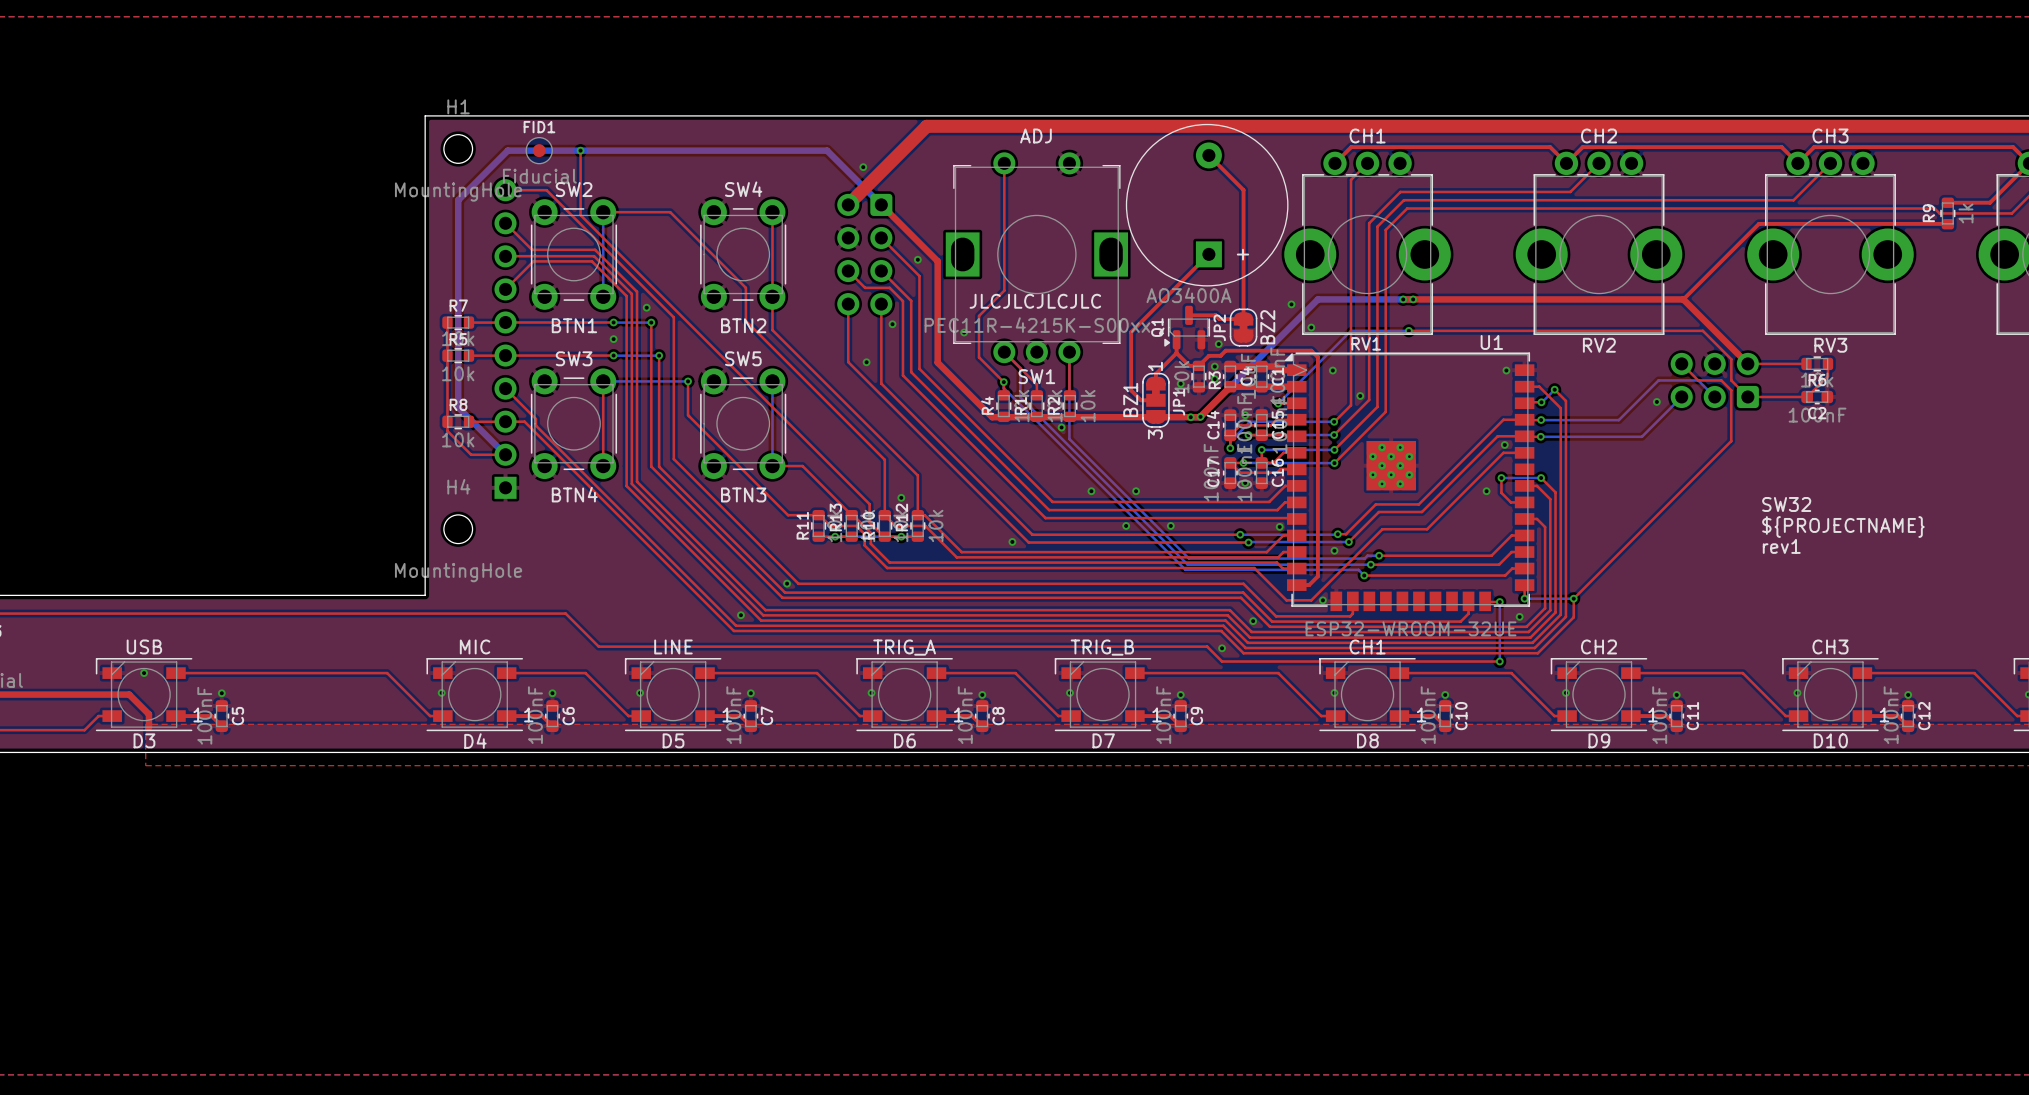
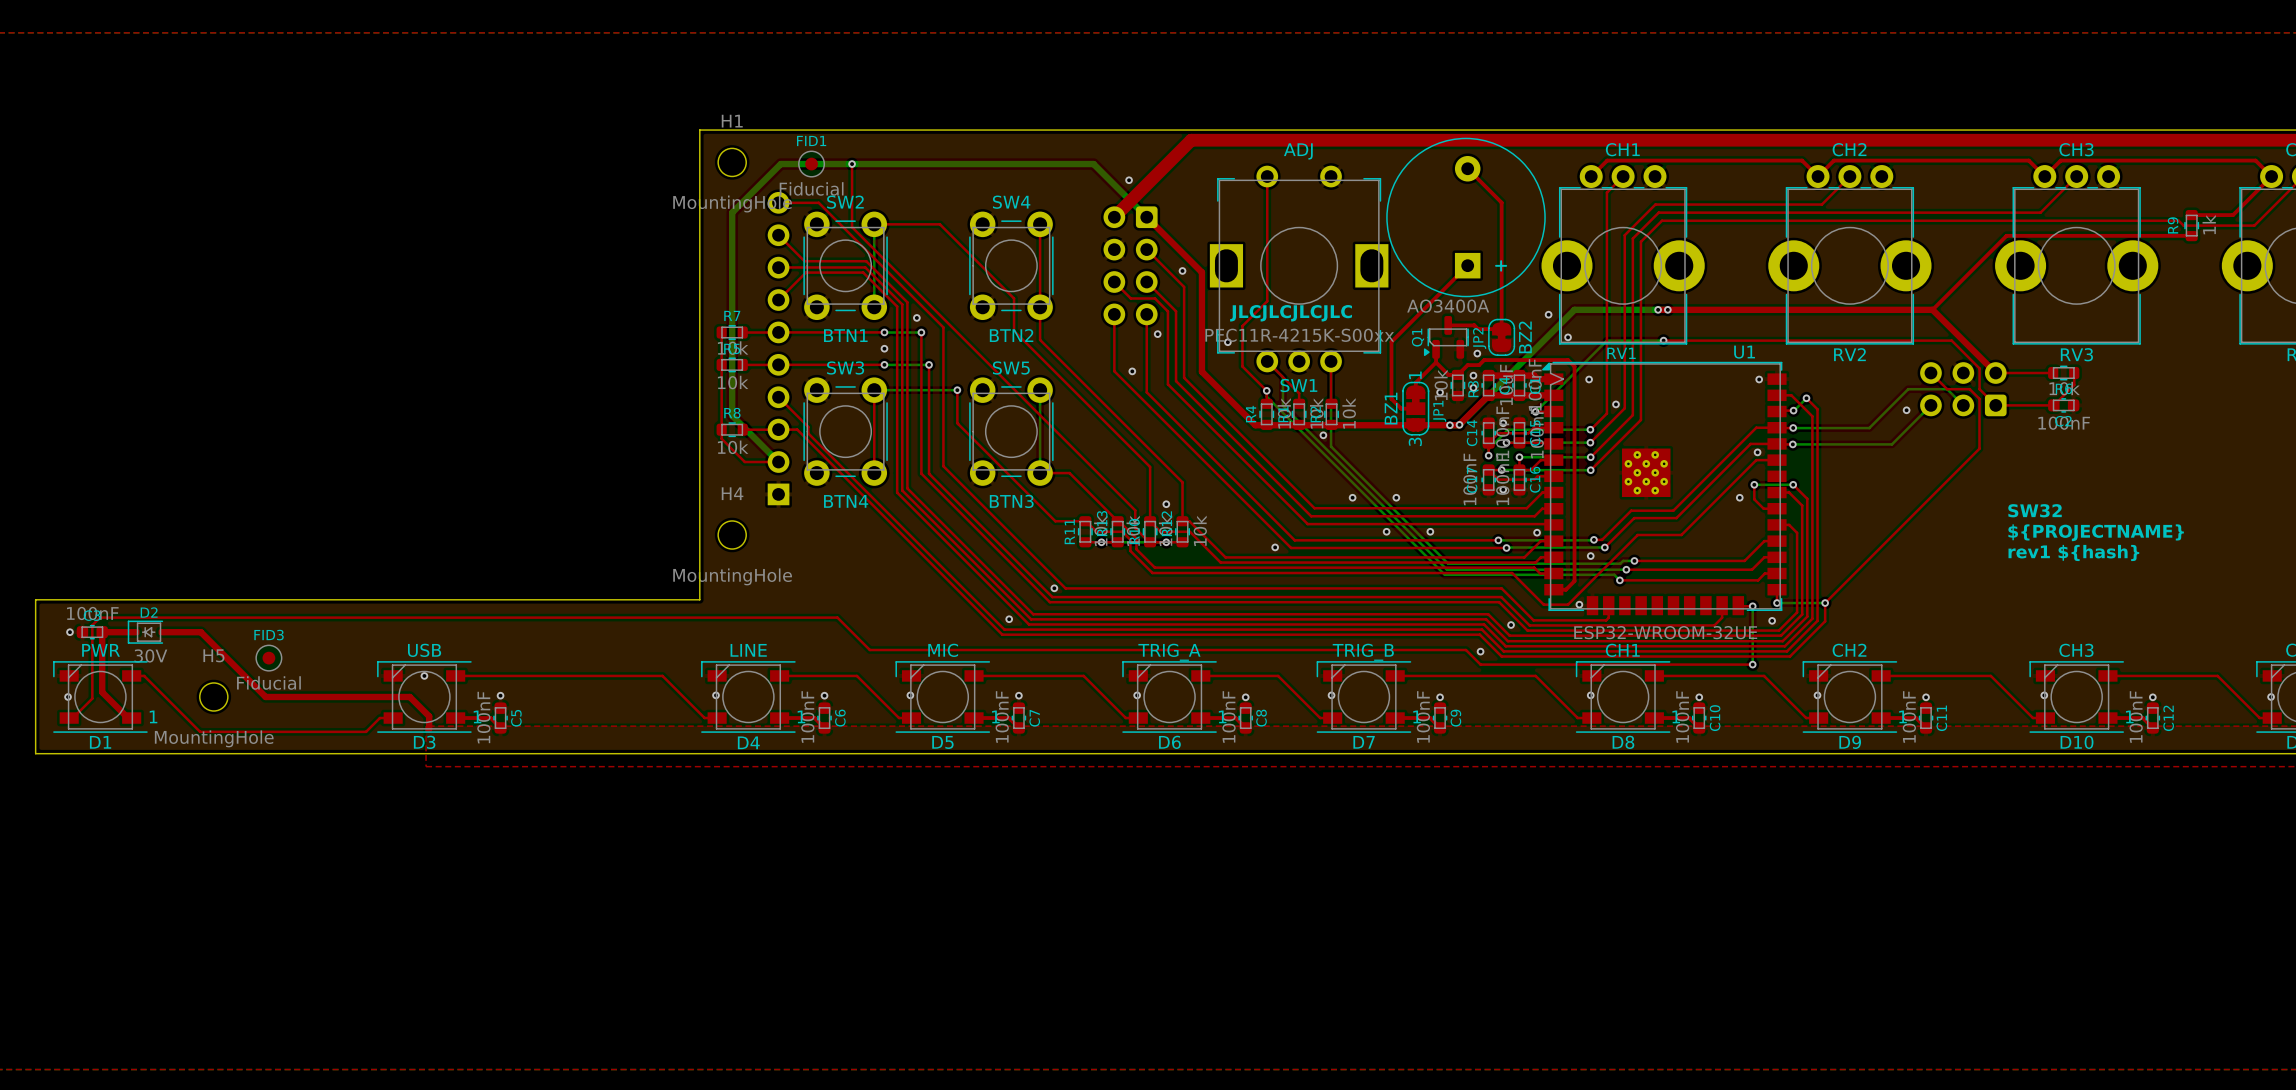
text: rev1 (1781, 546) -> rev1 ${hash} (2073, 552)
D4 value: MIC (475, 646) -> LINE (748, 650)
D5 value: LINE (673, 646) -> MIC (943, 650)

